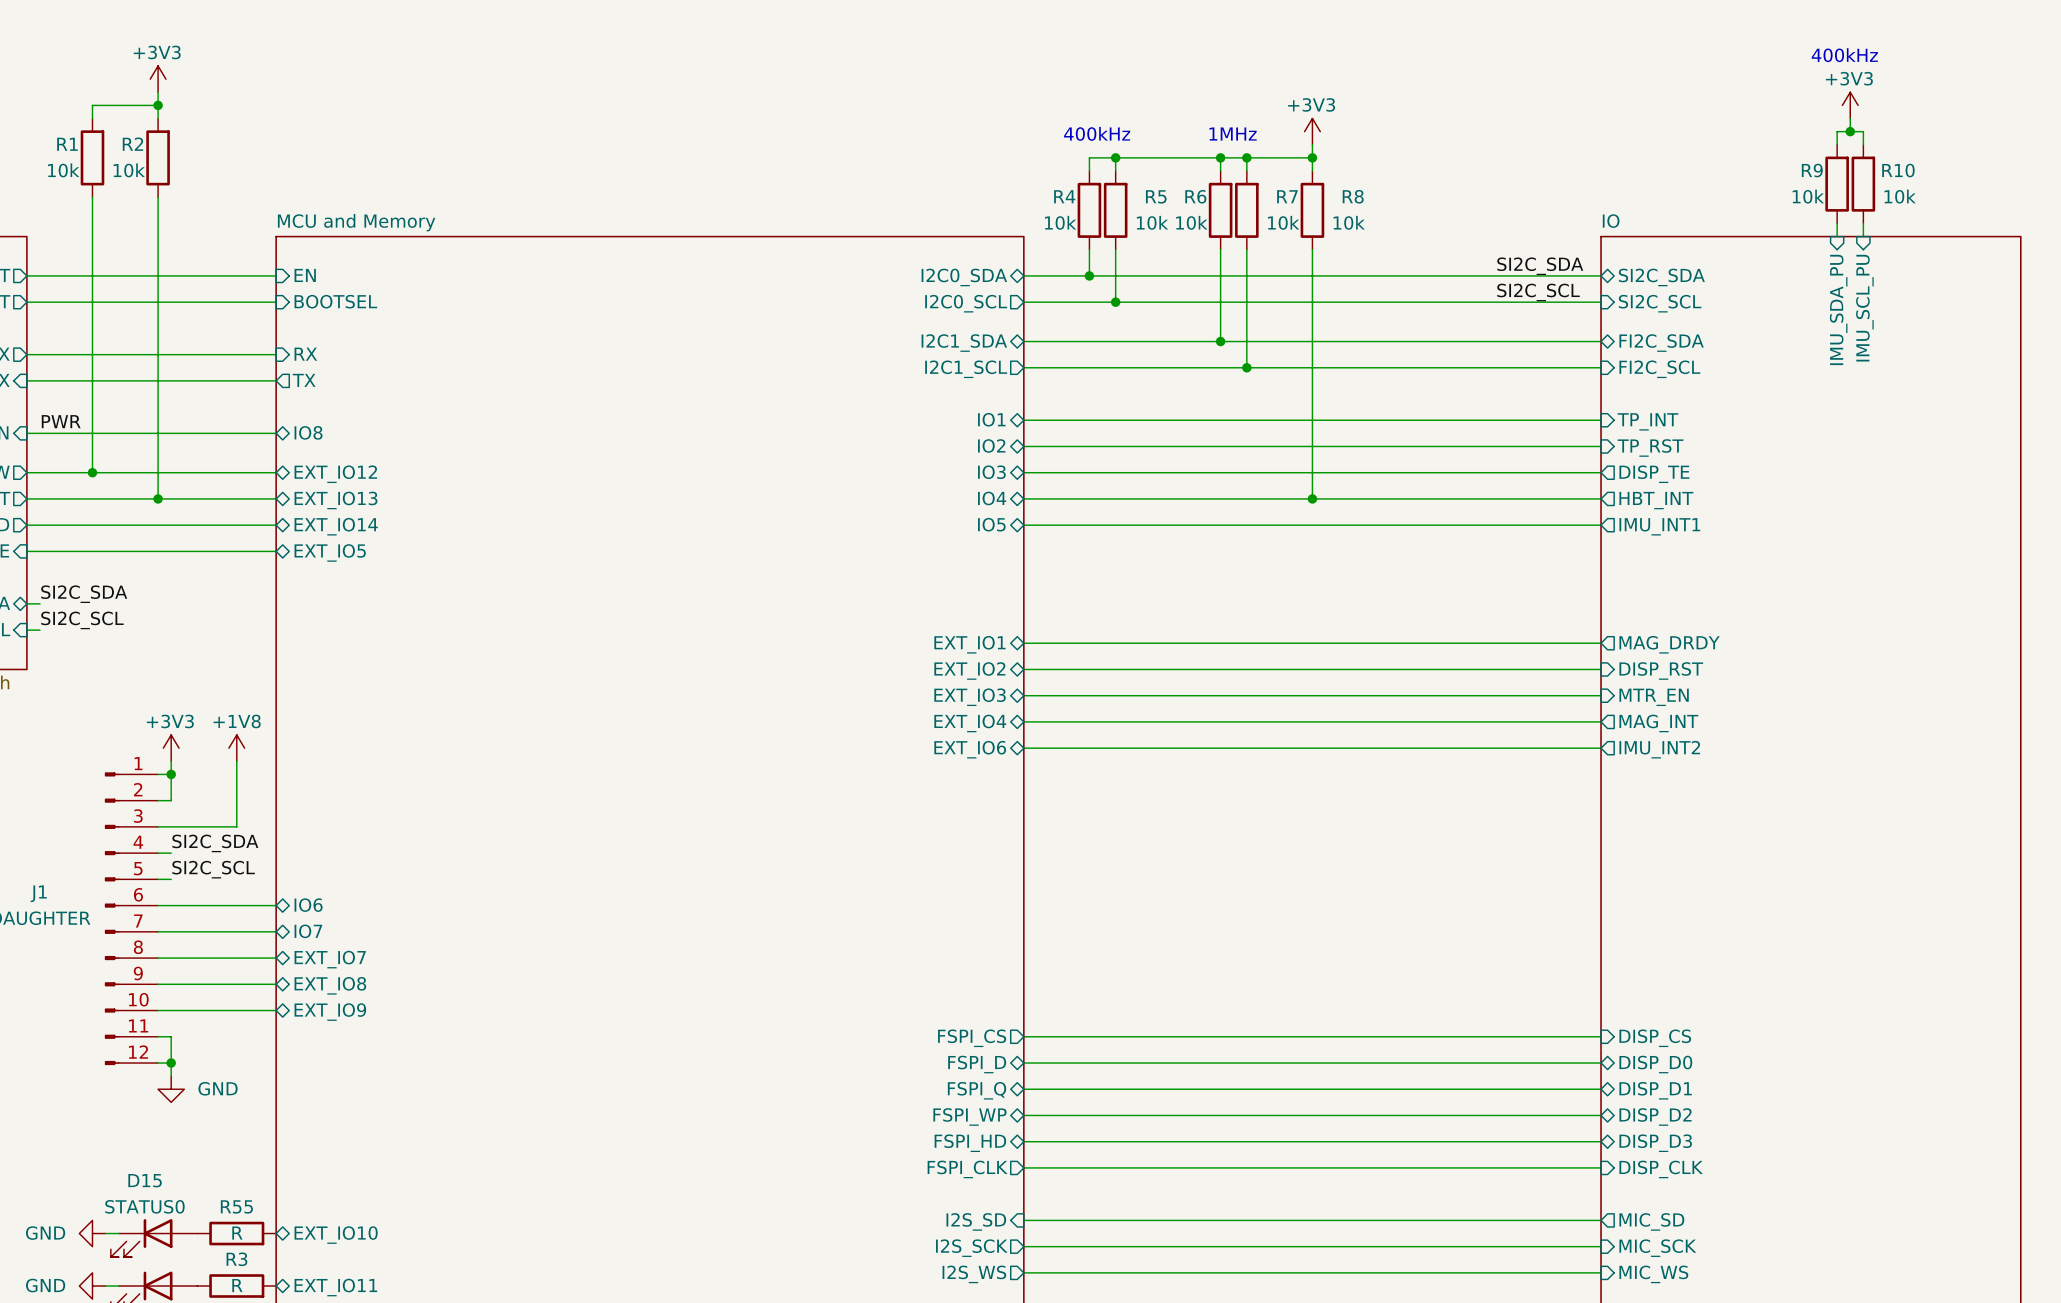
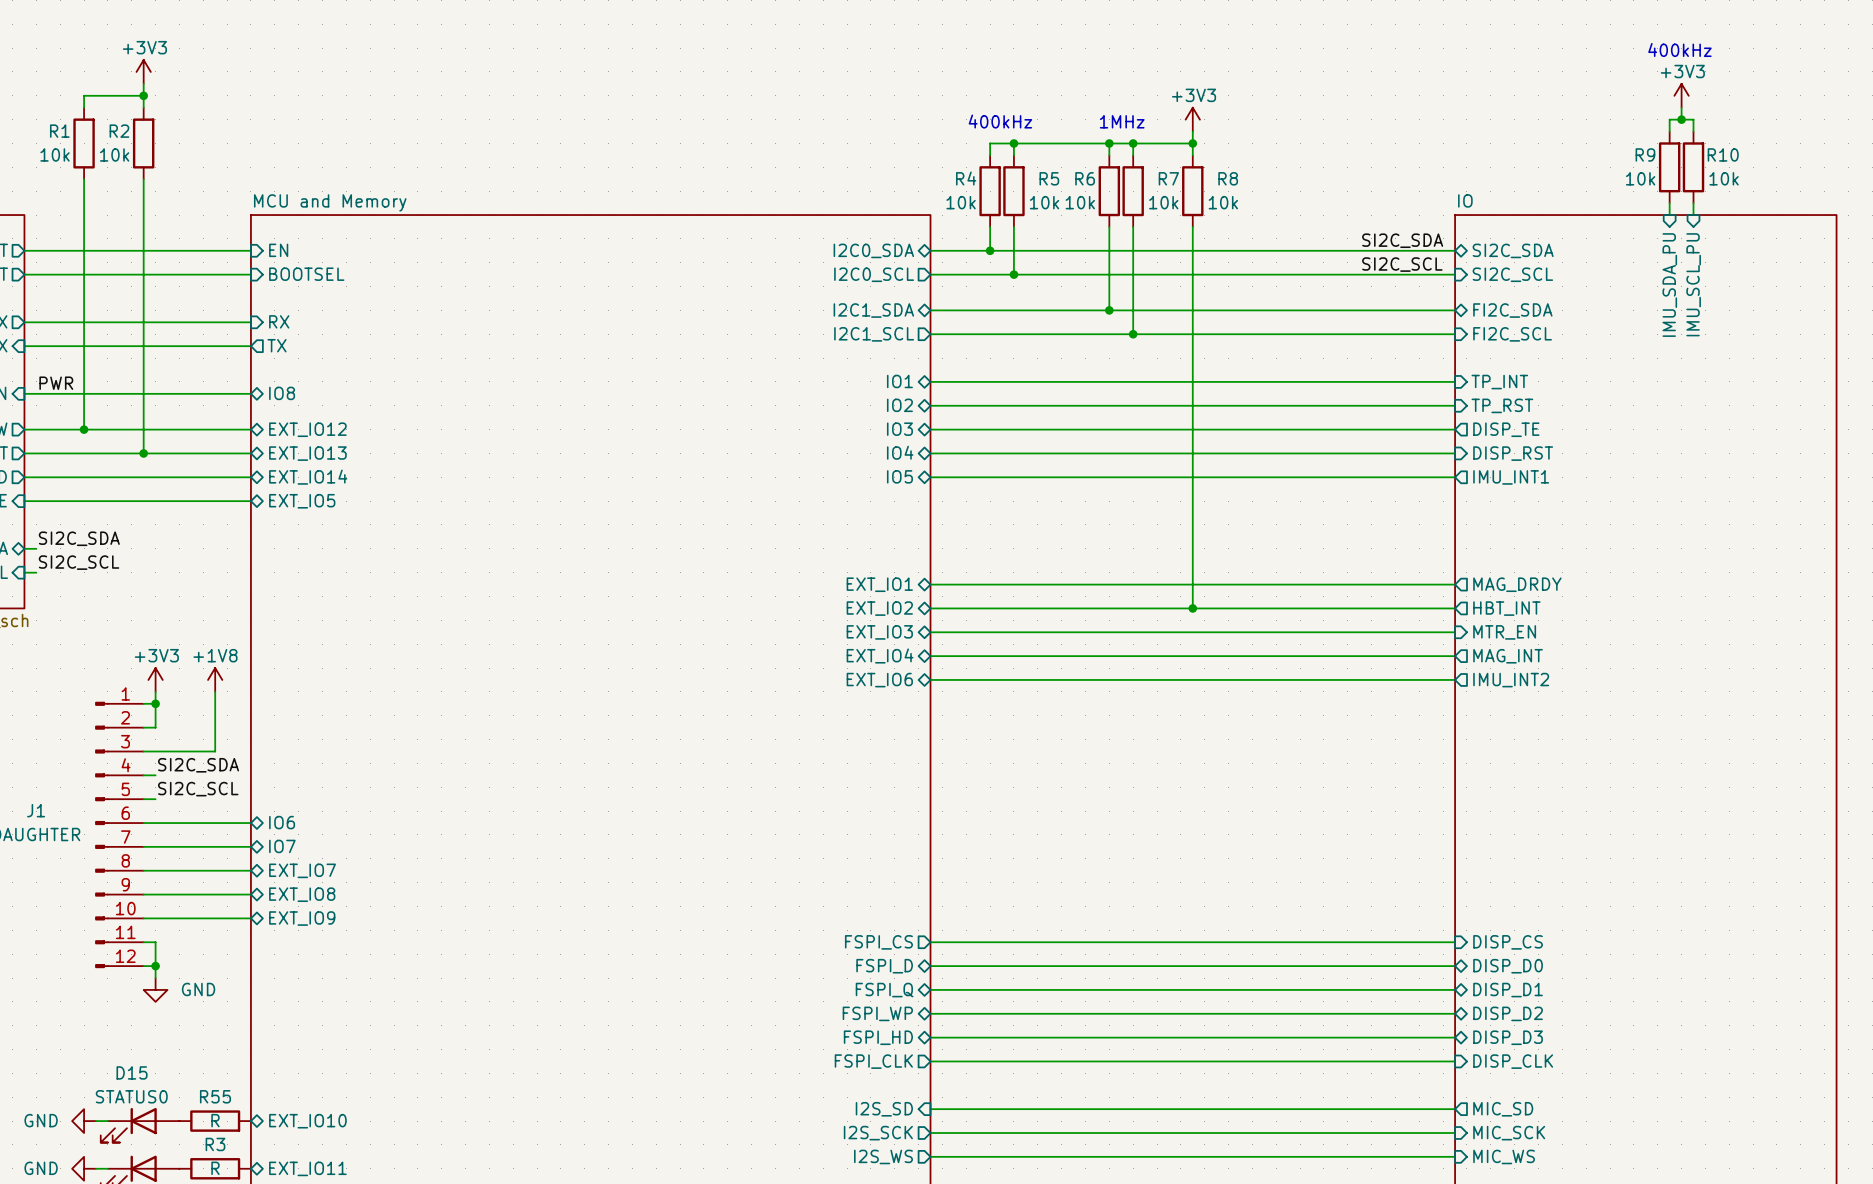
wire: none -> (1192, 453) (1192, 608)
junction: (1312, 498) -> none
sheet pin shape: output (1656, 500) -> input (1513, 453)
sheet pin: HBT_INT (1656, 500) -> DISP_RST (1513, 453)
junction: none -> (1192, 608)
sheet pin shape: input (1661, 670) -> output (1506, 608)
sheet pin: DISP_RST (1661, 670) -> HBT_INT (1506, 608)

